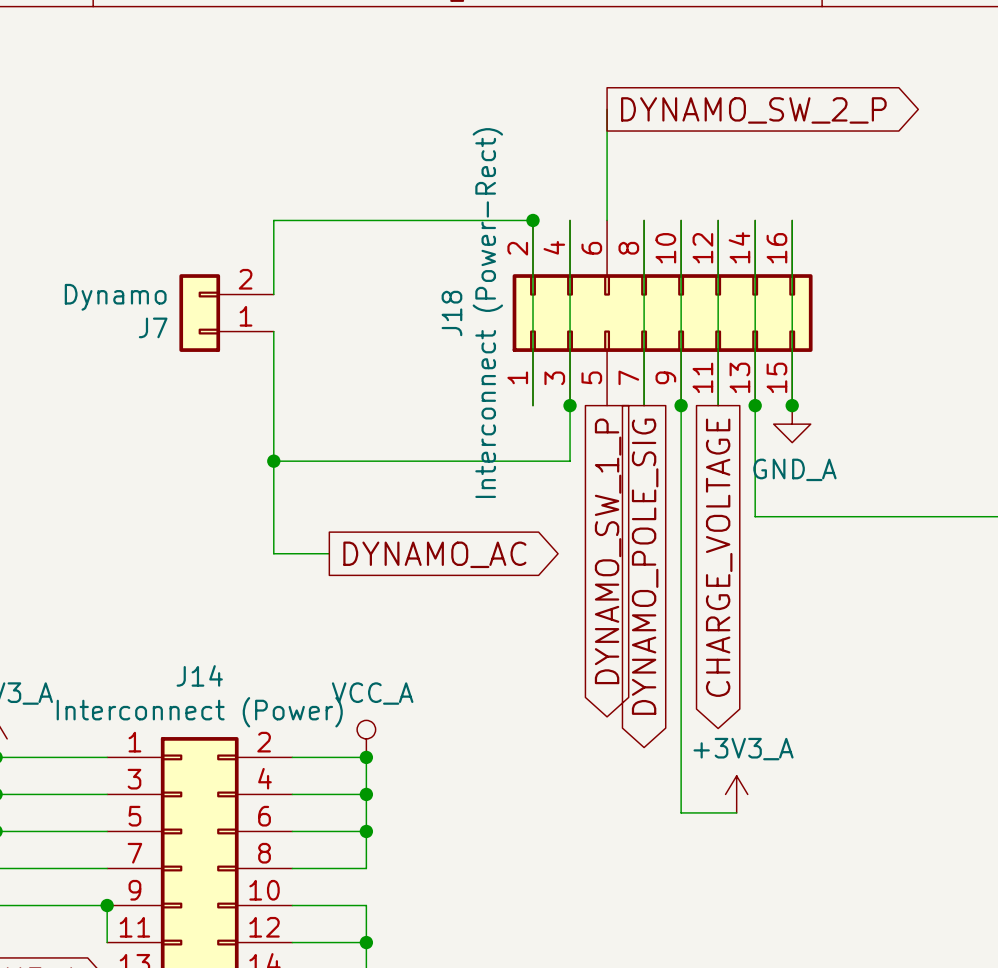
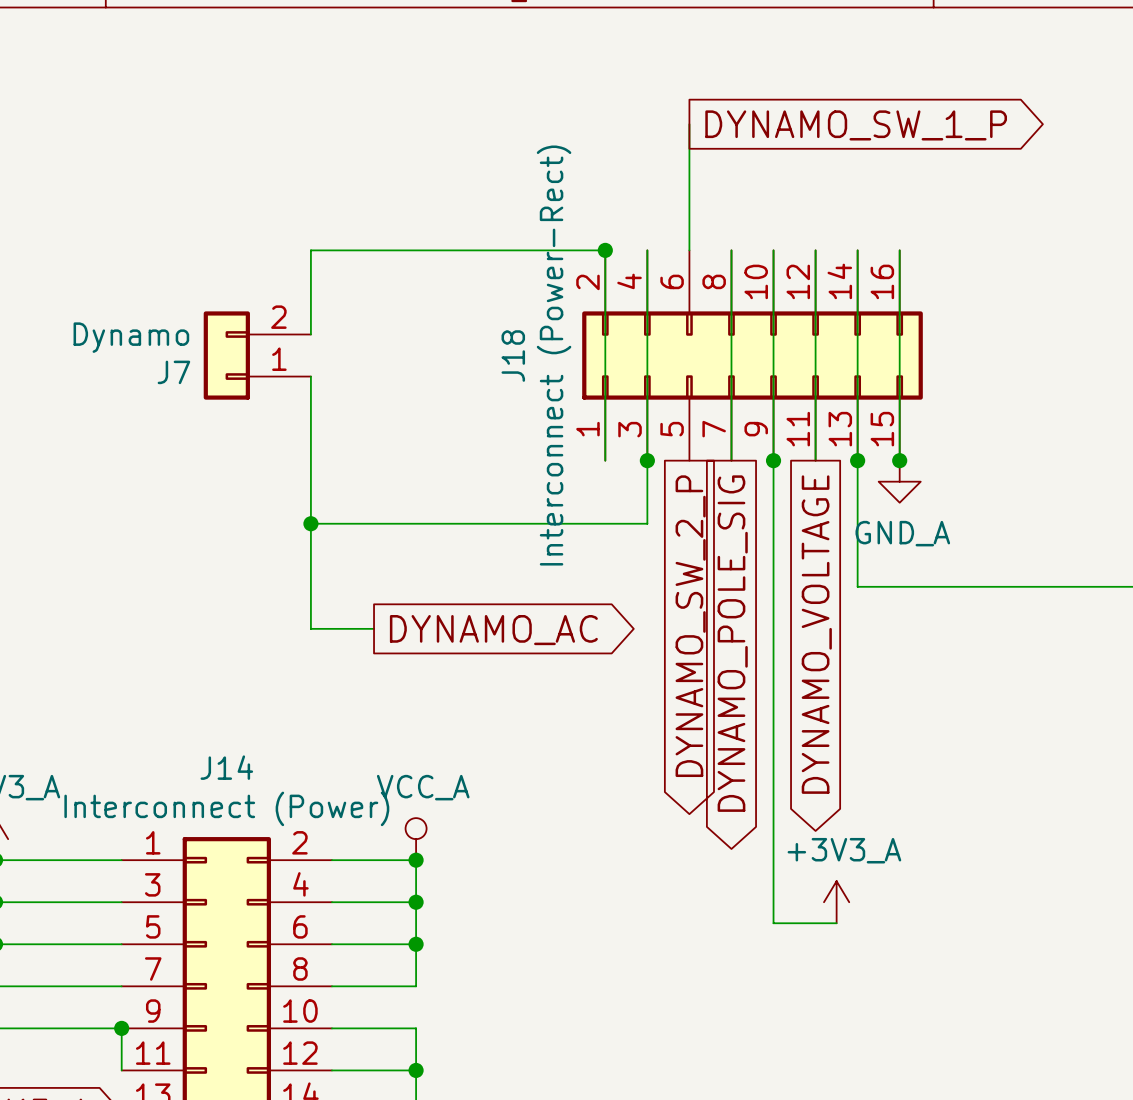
global label: DYNAMO_SW_2_P (753, 110) -> DYNAMO_SW_1_P (856, 125)
global label: DYNAMO_SW_1_P (608, 551) -> DYNAMO_SW_2_P (690, 626)
global label: CHARGE_VOLTAGE (719, 557) -> DYNAMO_VOLTAGE (816, 634)

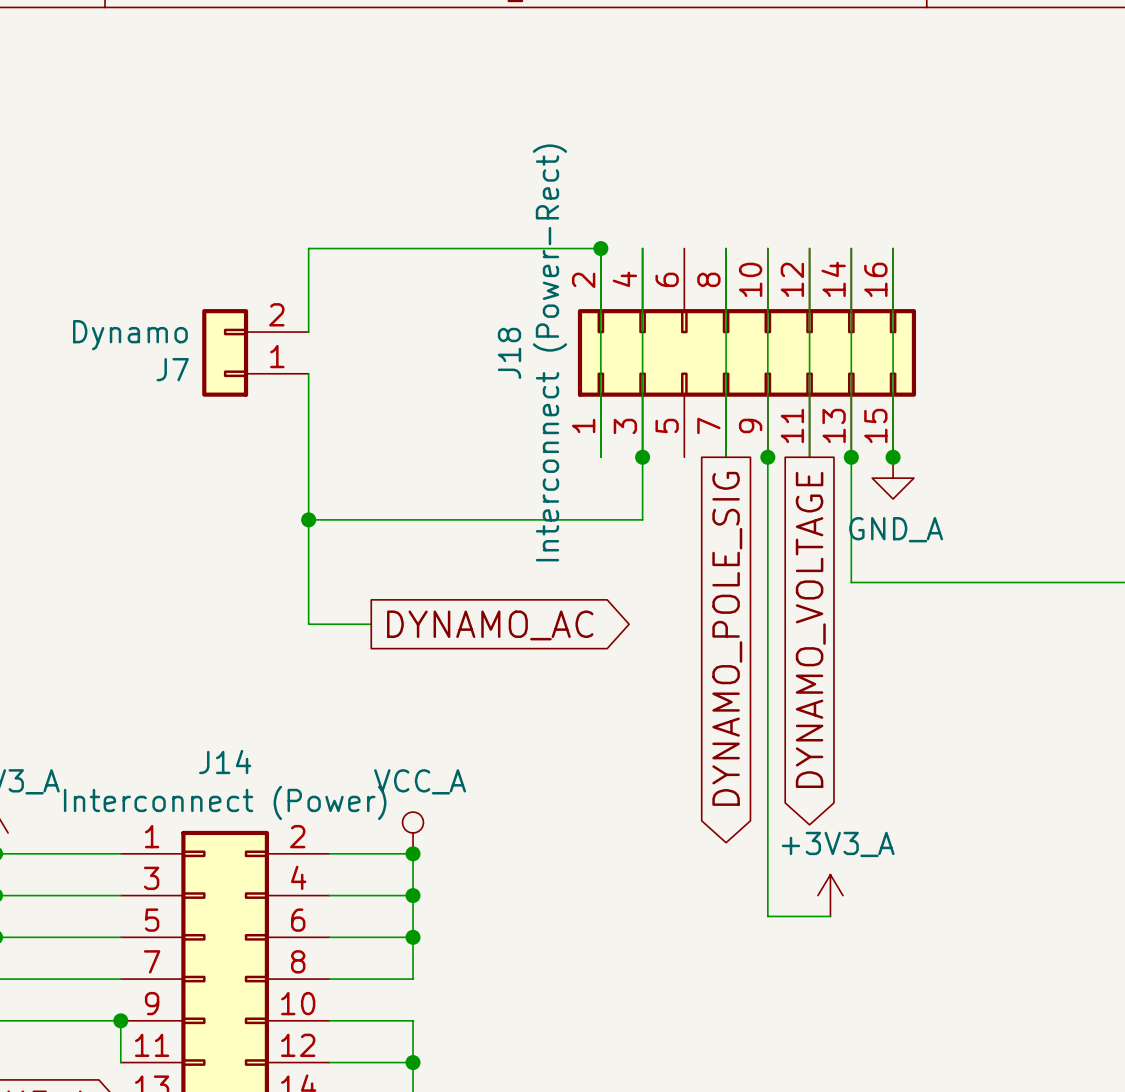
wire: (689, 124) (689, 250) -> none
global label: DYNAMO_SW_1_P (856, 125) -> none
global label: DYNAMO_SW_2_P (690, 626) -> none

